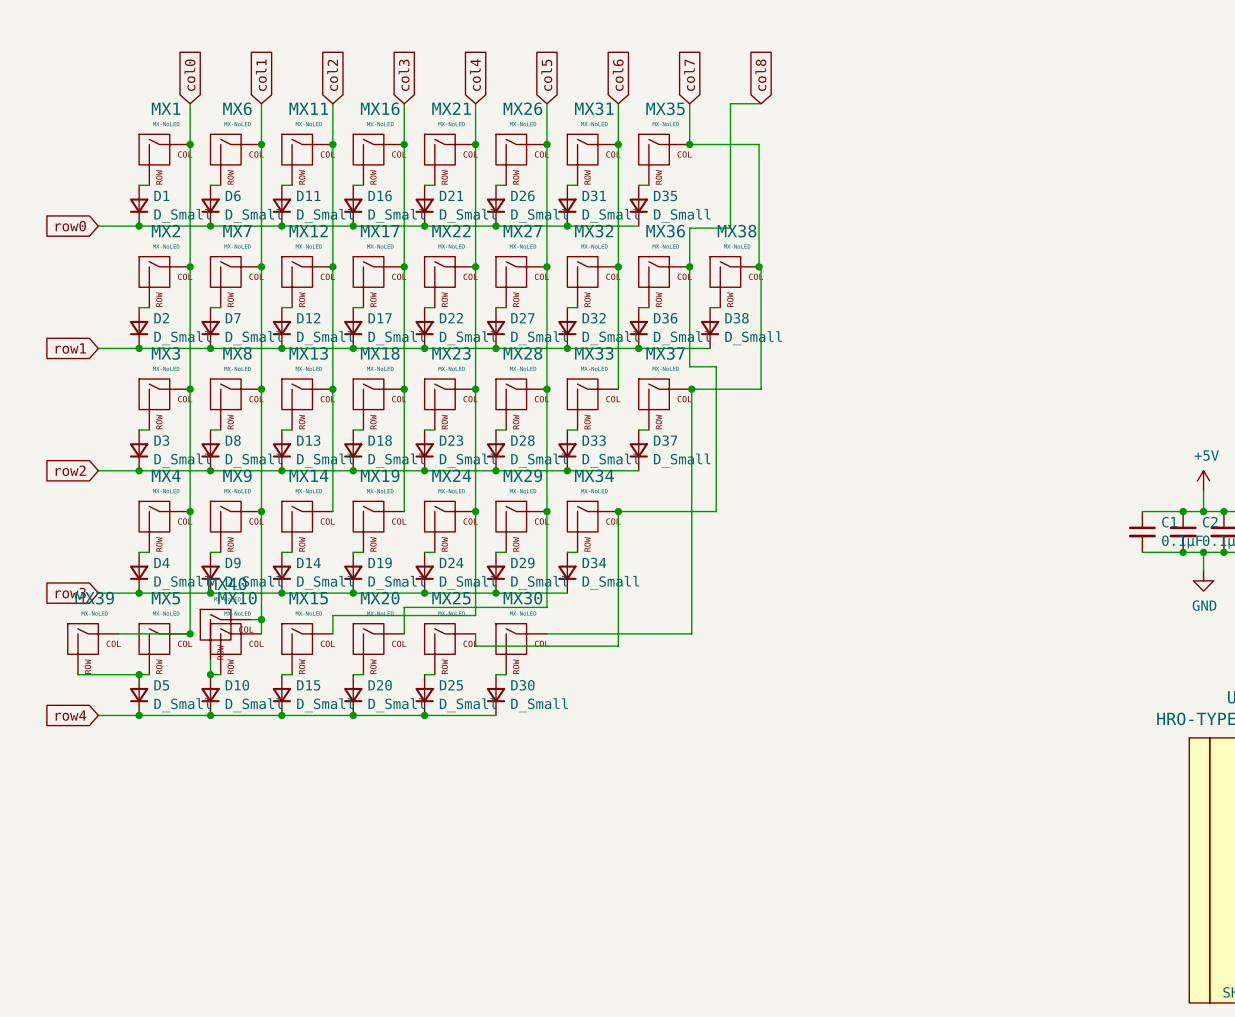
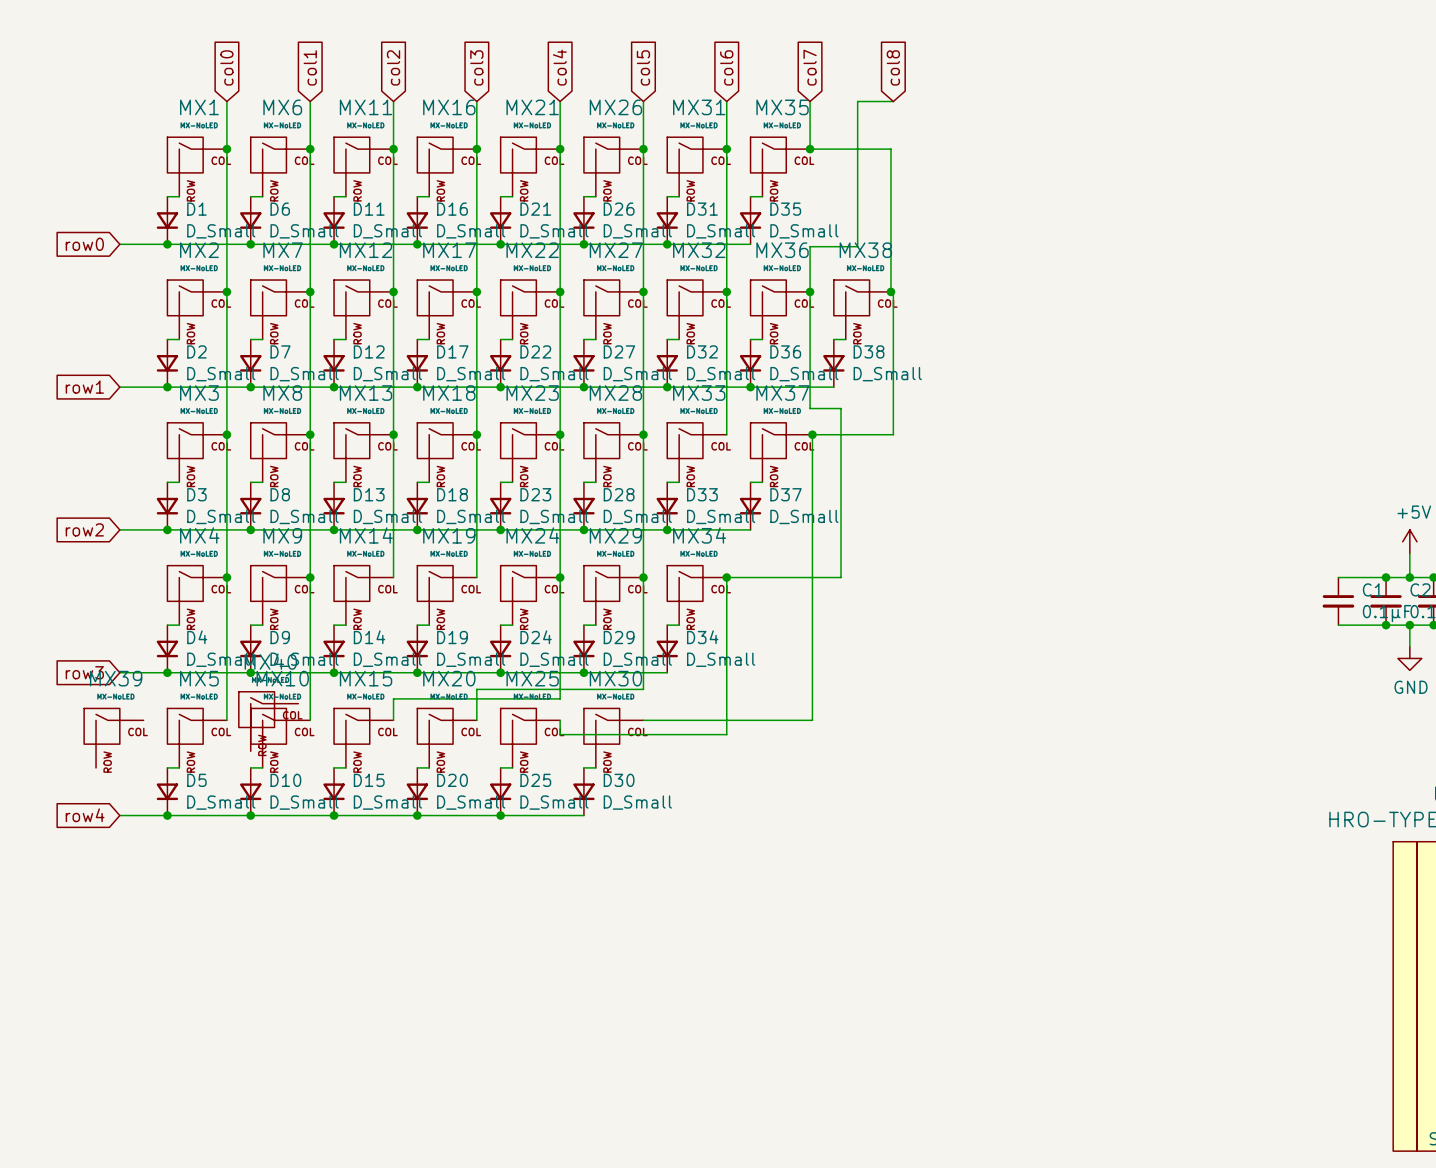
wire: (251, 619) (261, 619) -> none
junction: (261, 619) -> none
wire: (118, 633) (190, 633) -> none
junction: (190, 633) -> none
wire: (210, 660) (210, 674) -> none
wire: (77, 674) (139, 674) -> none
junction: (139, 674) -> none
junction: (210, 674) -> none

